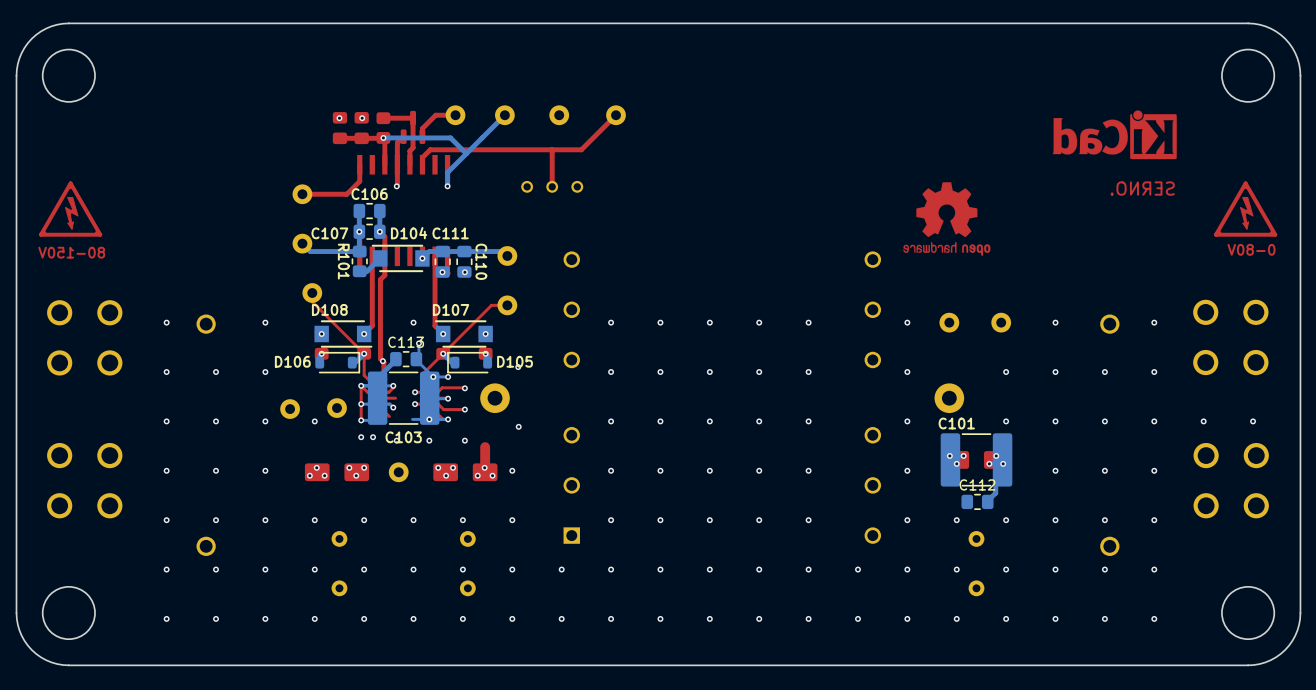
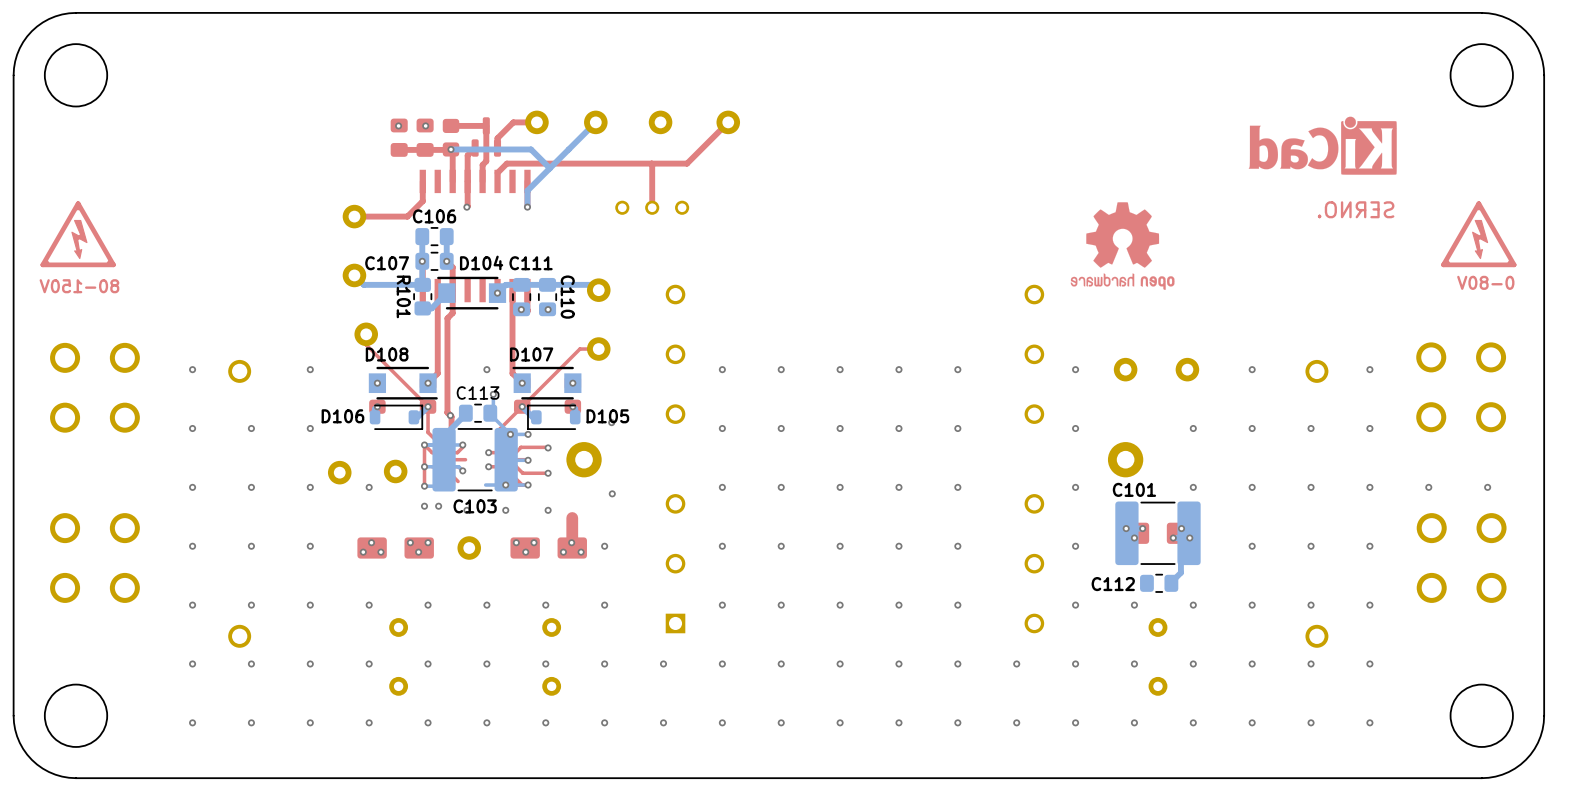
C112 name position: C112 (977, 484) -> C112 (1113, 584)

